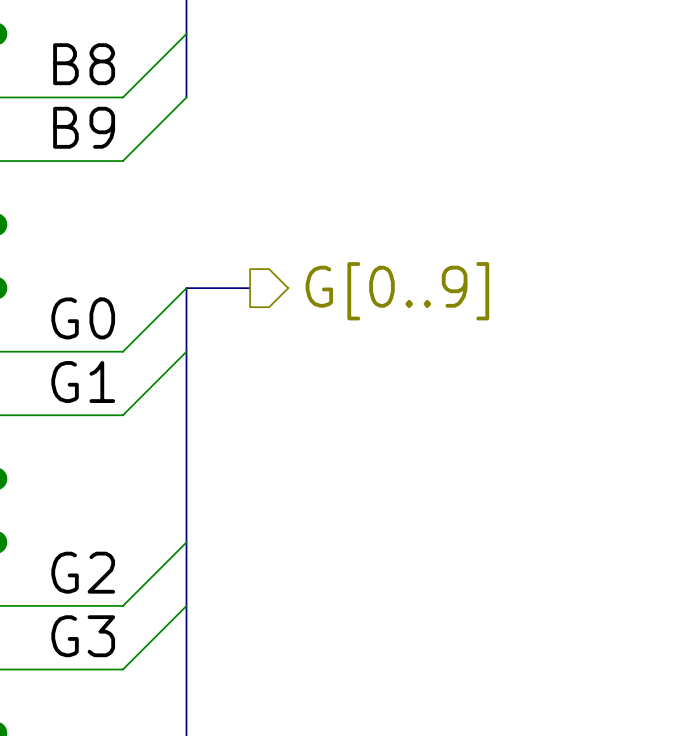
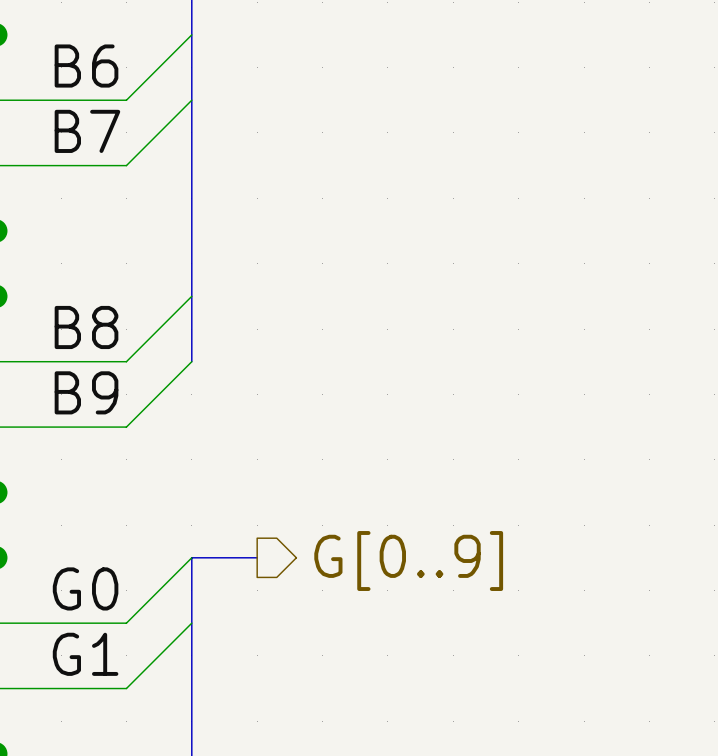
label: B8 (84, 64) -> B6 (86, 66)
label: B9 (84, 127) -> B7 (87, 131)
bus: (186, 288) (250, 288) -> (191, 296) (191, 100)
hierarchical label position: G[0..9] (397, 291) -> G[0..9] (408, 561)
label: G0 (83, 318) -> B8 (86, 327)
bus: (186, 351) (186, 542) -> (257, 557) (191, 557)
label: G1 (83, 382) -> B9 (86, 392)
label: G2 (83, 572) -> G0 (85, 588)
label: G3 (83, 636) -> G1 (85, 654)

